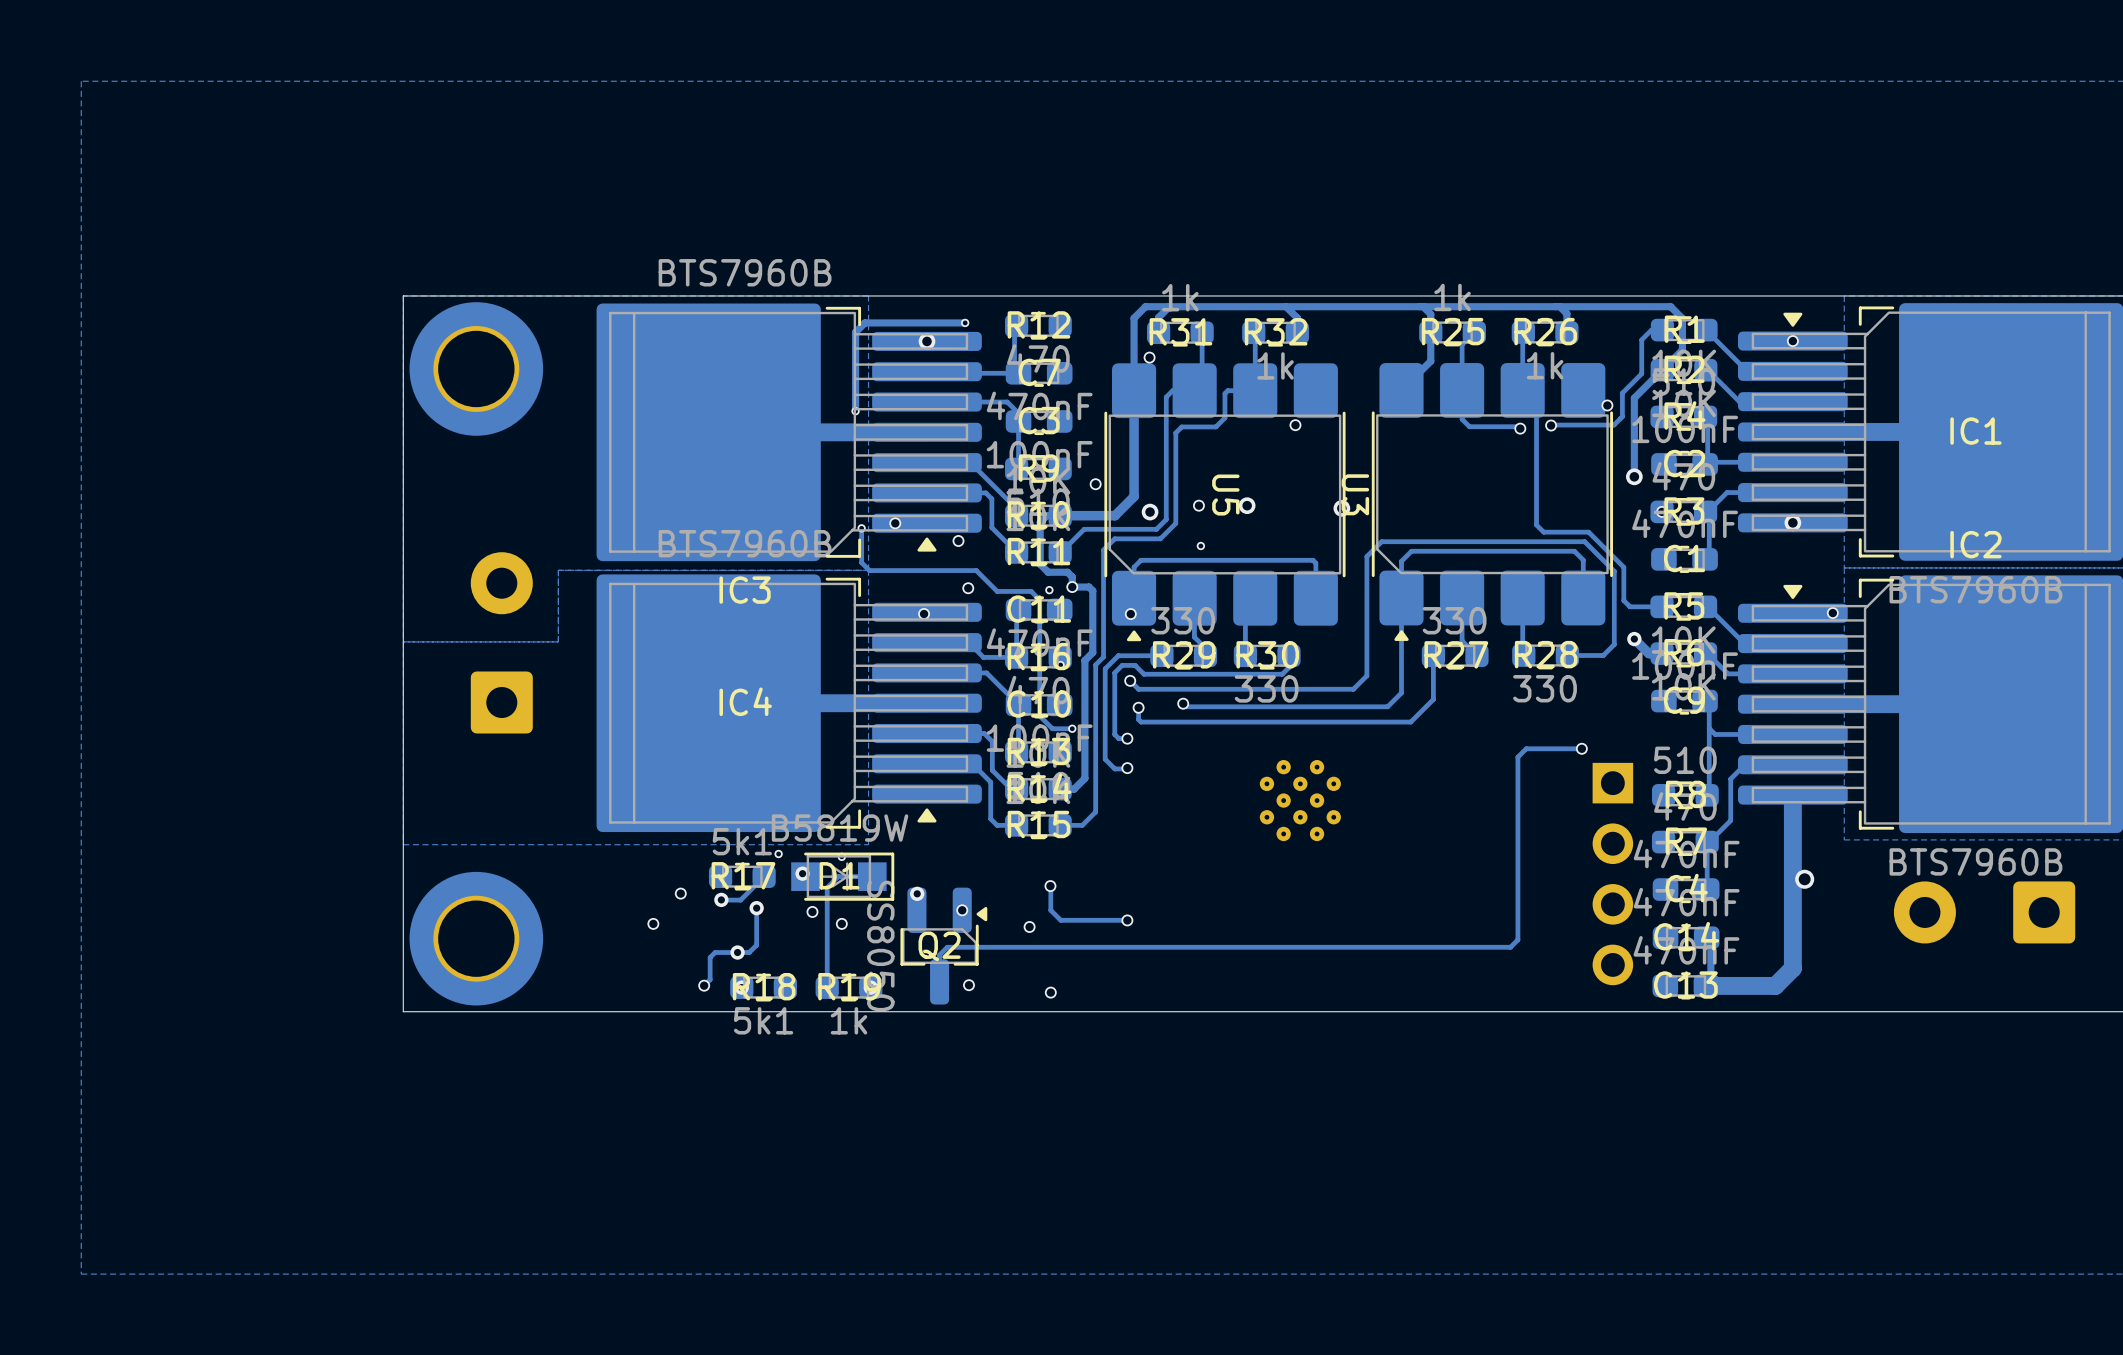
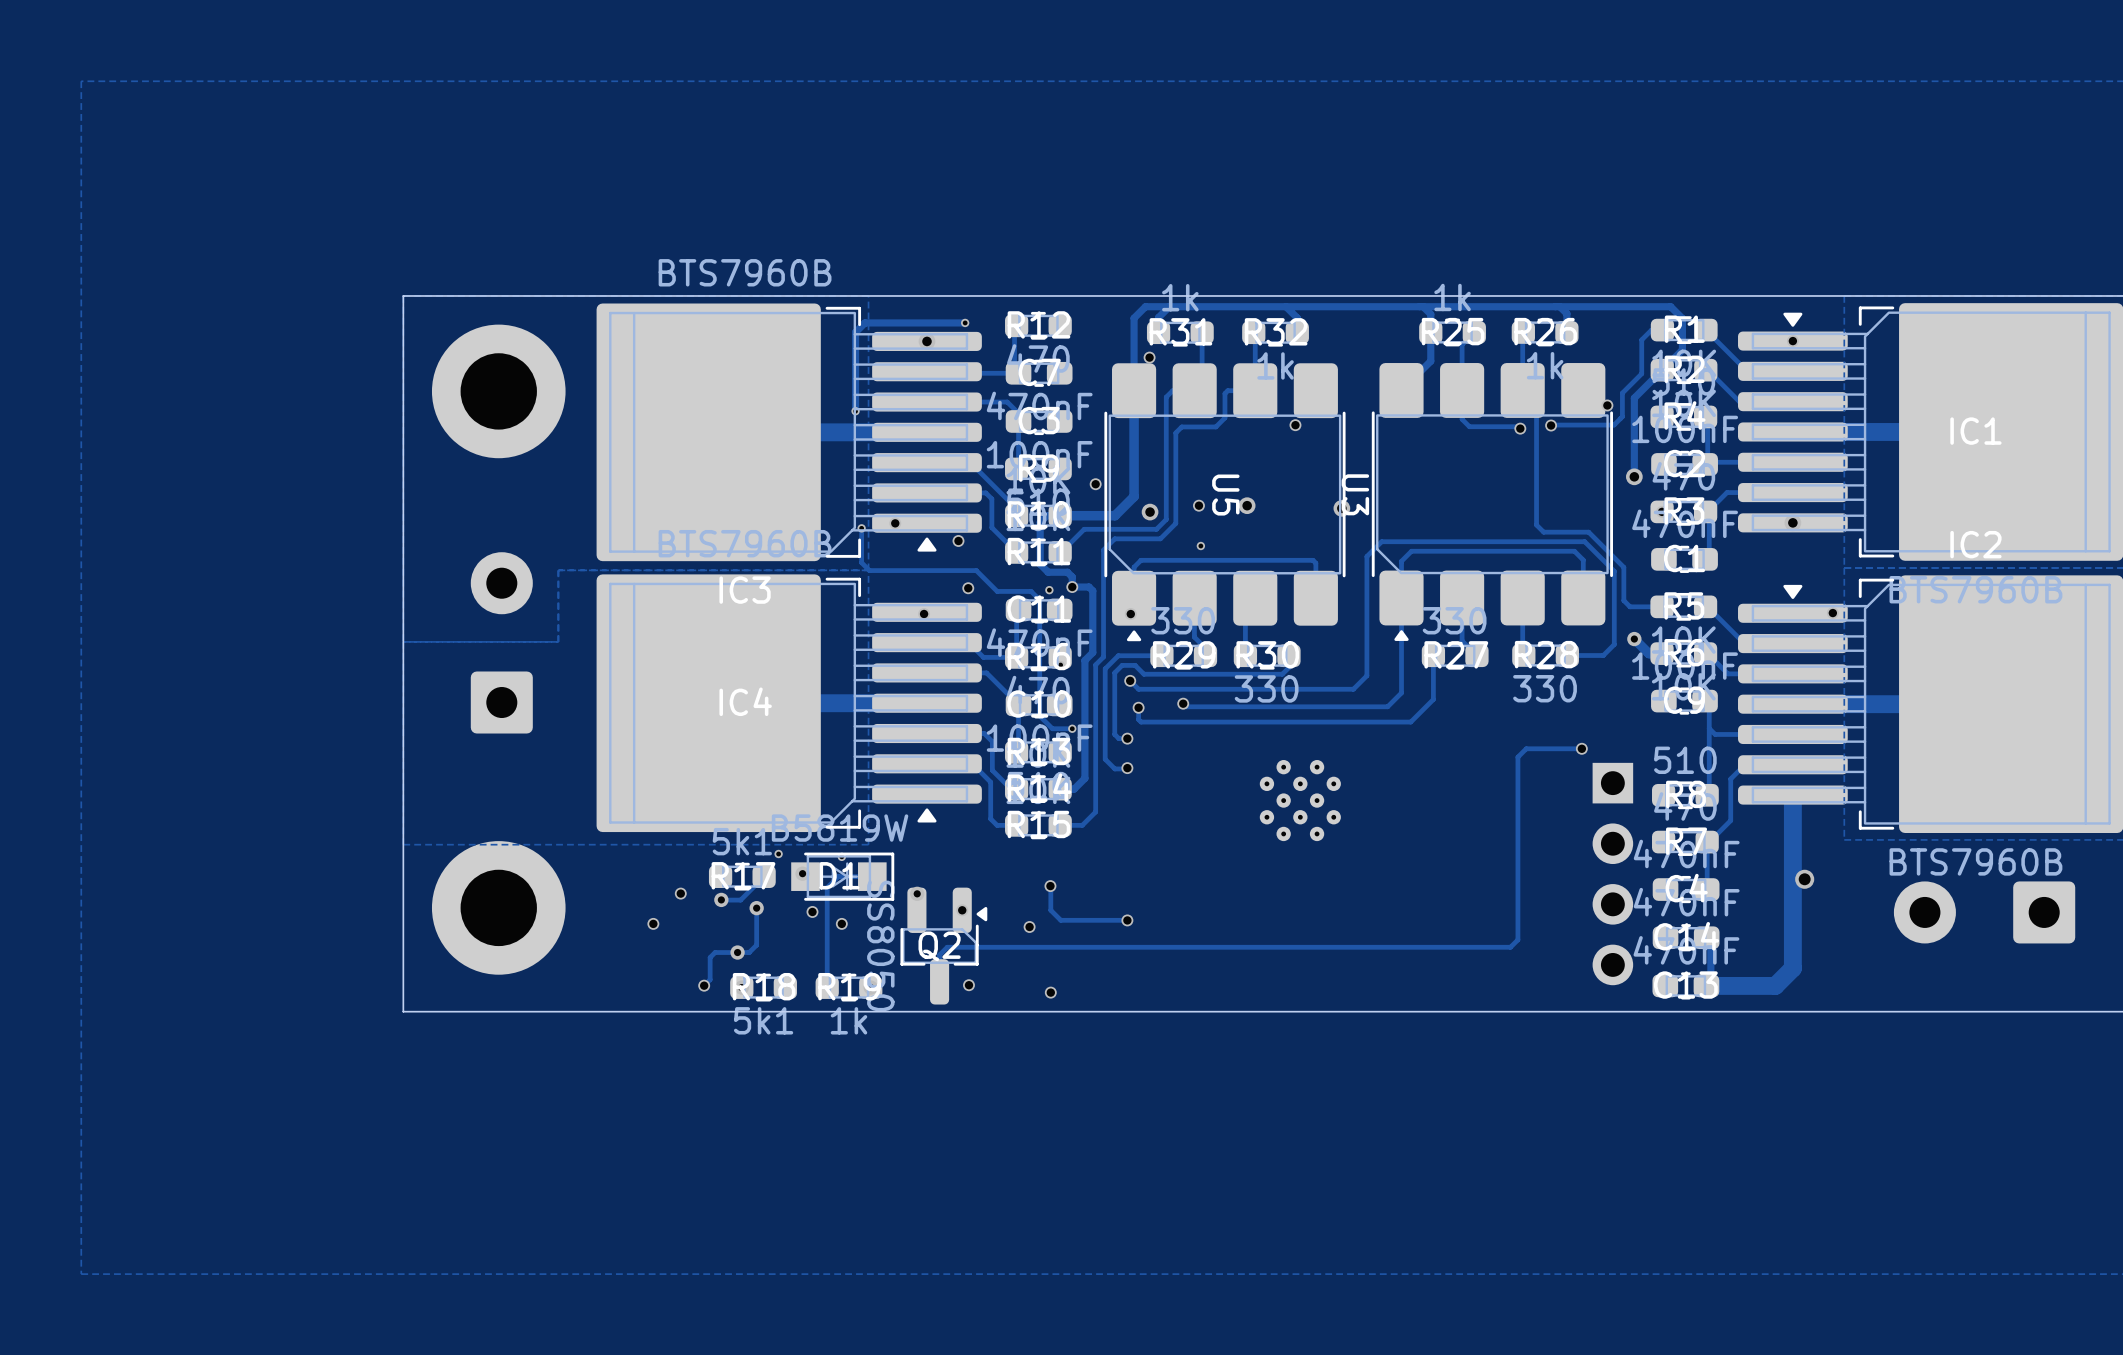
part position: (476, 368) -> (498, 391)
part position: (476, 938) -> (498, 907)

